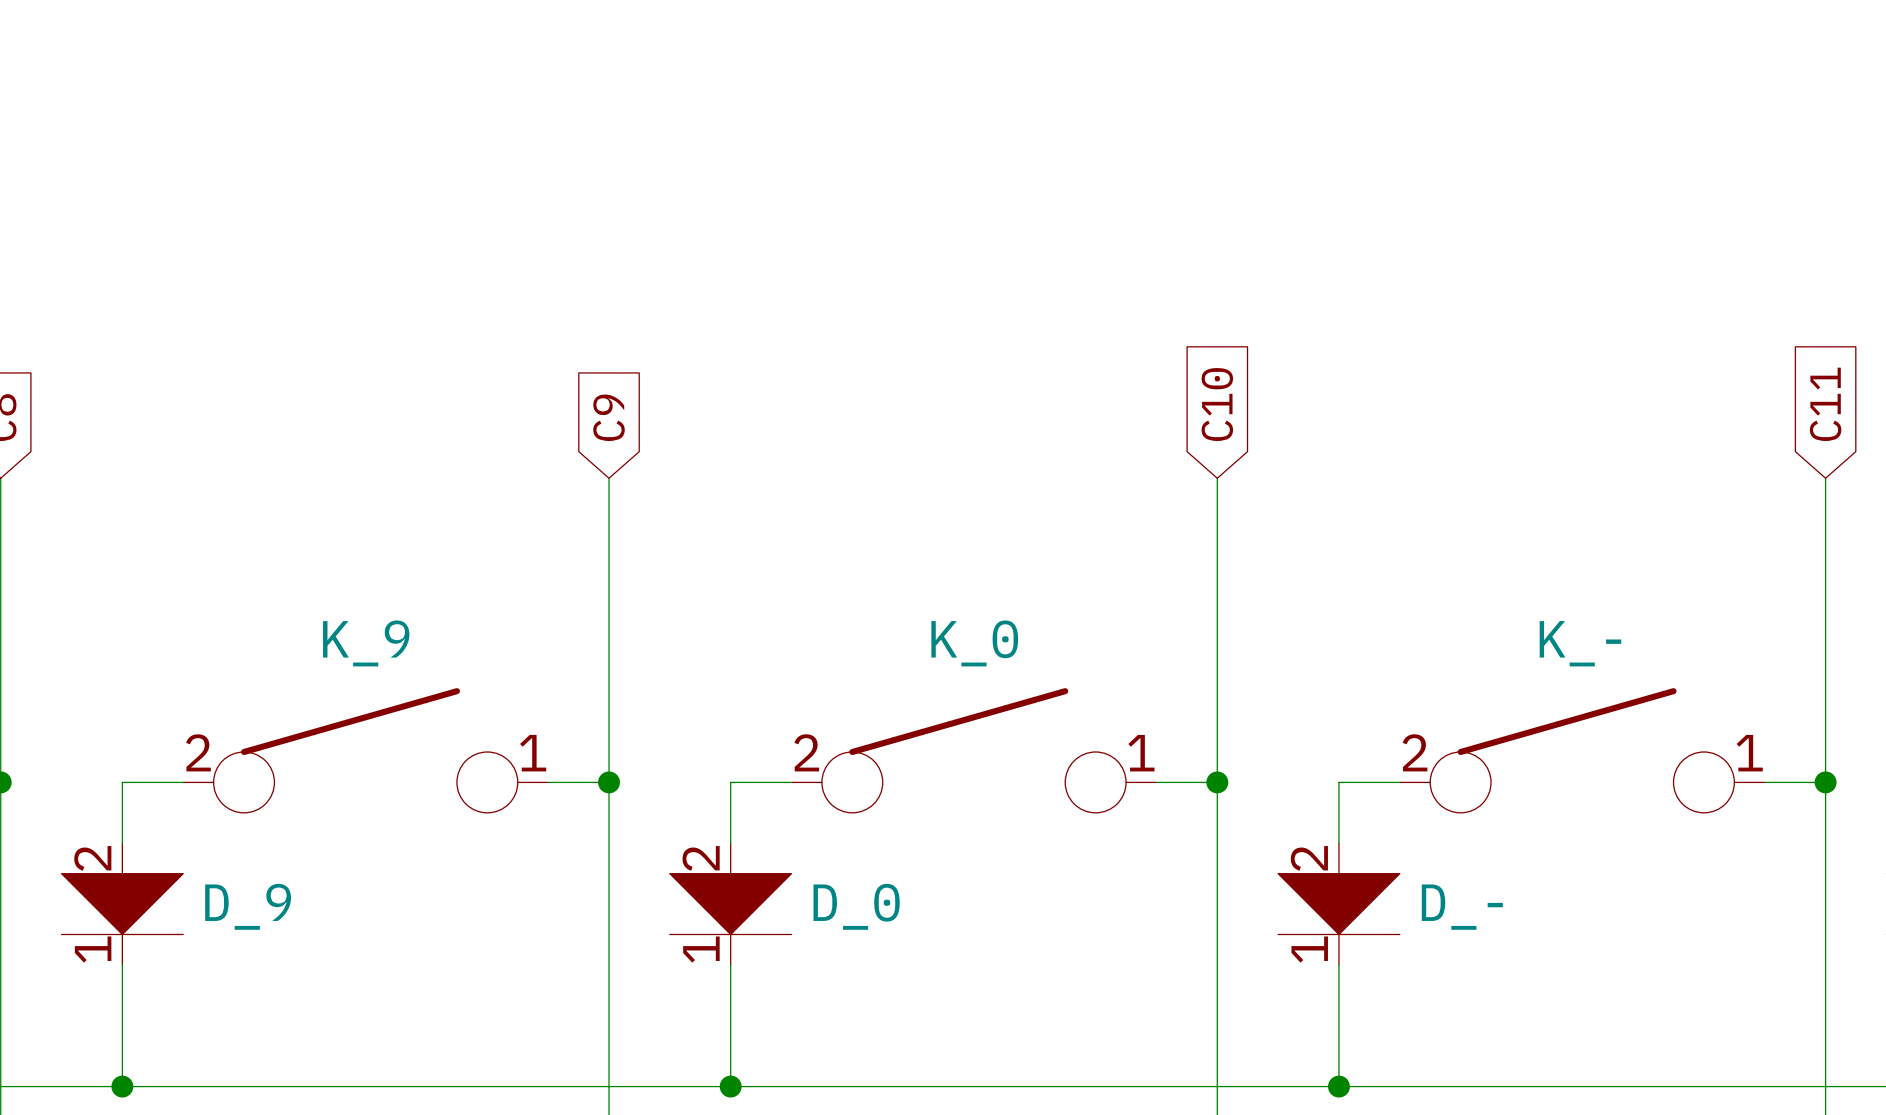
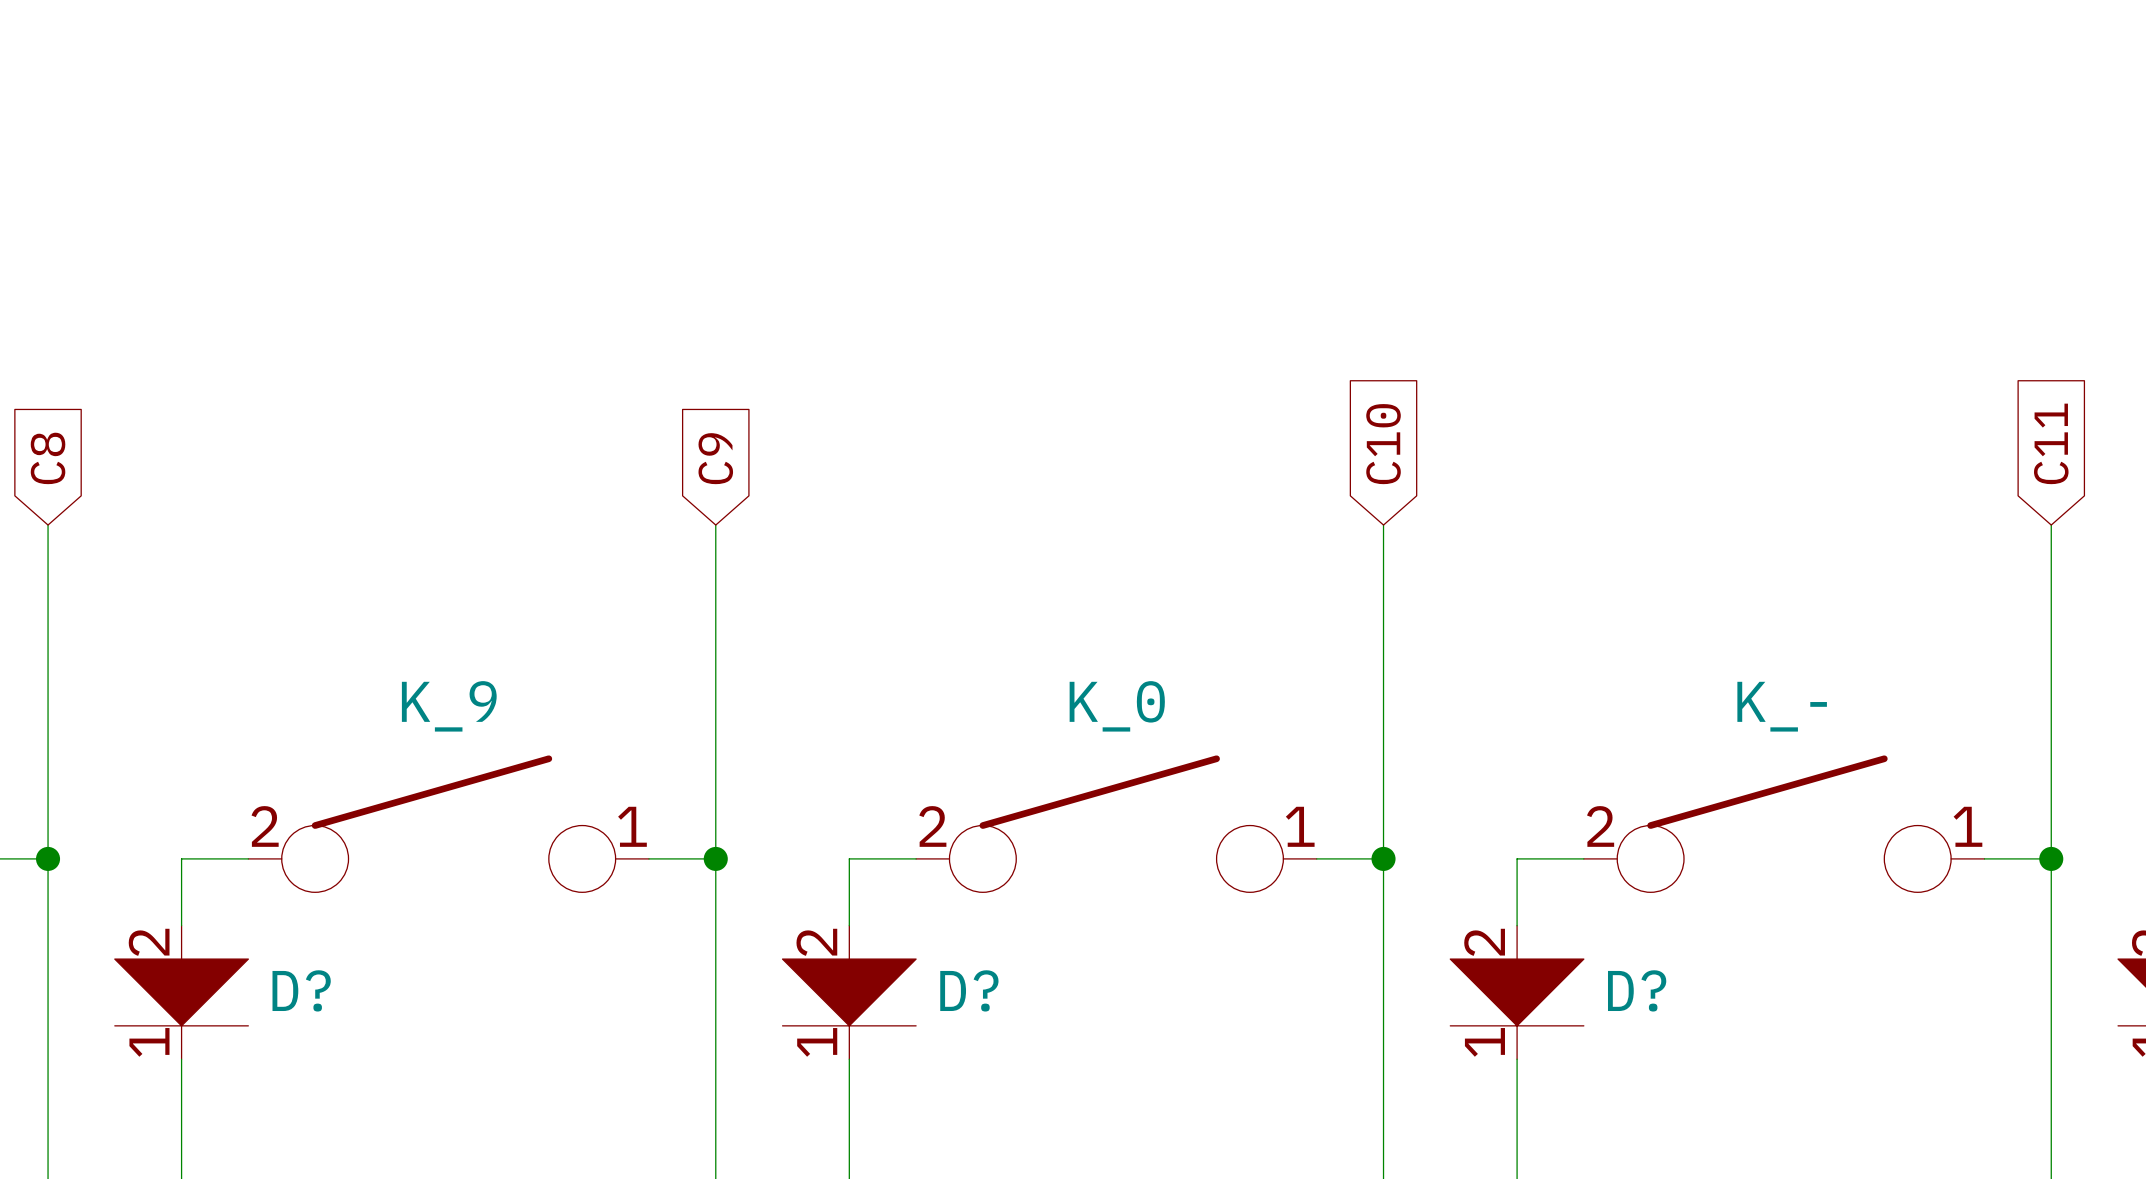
D_9 name: D_9 (248, 906) -> D? (301, 990)
D_0 name: D_0 (856, 906) -> D? (969, 990)
D_- name: D_- (1462, 907) -> D? (1637, 990)

